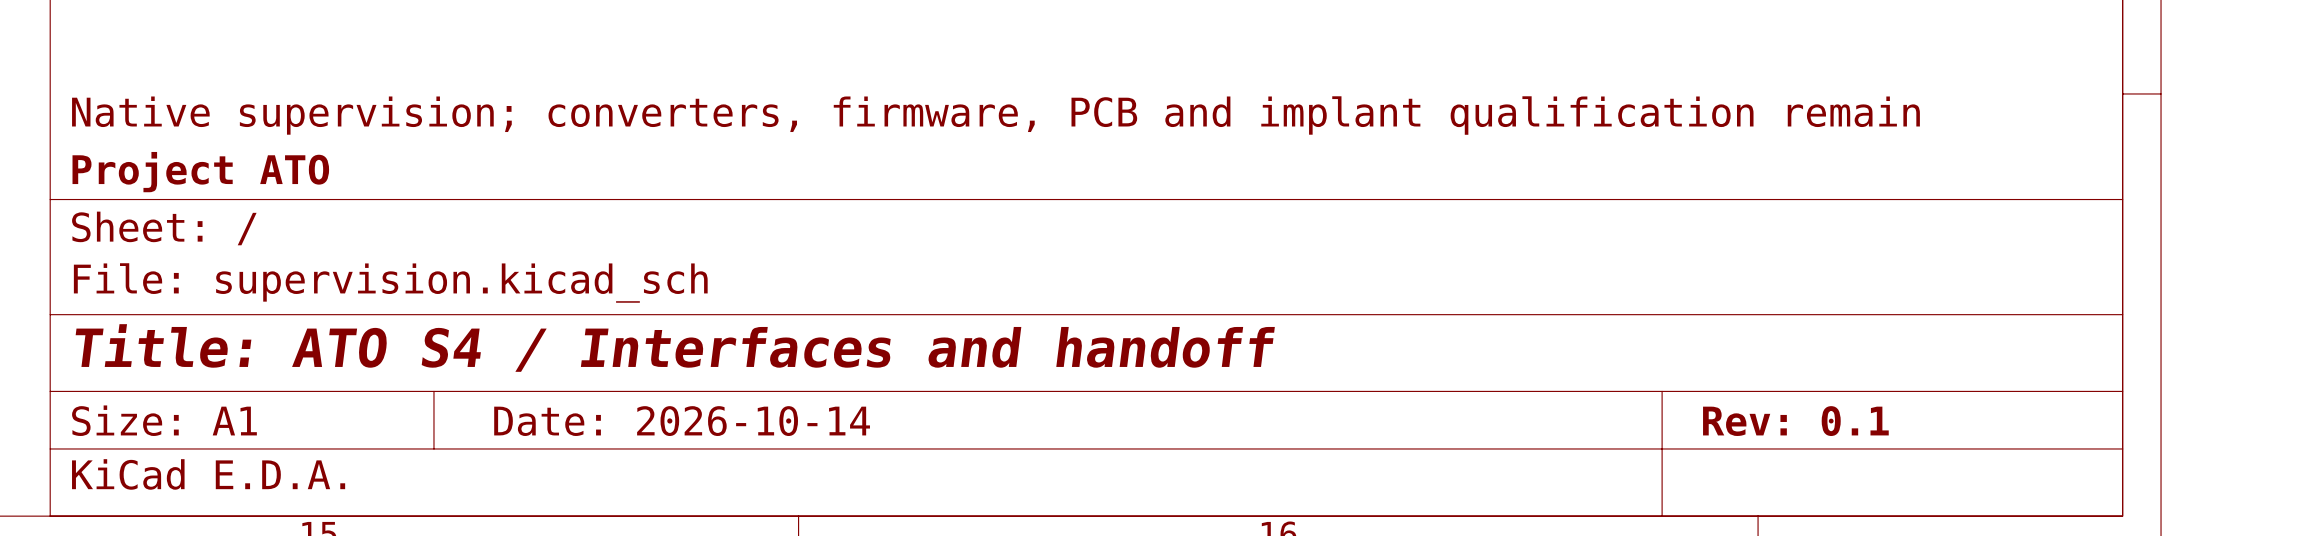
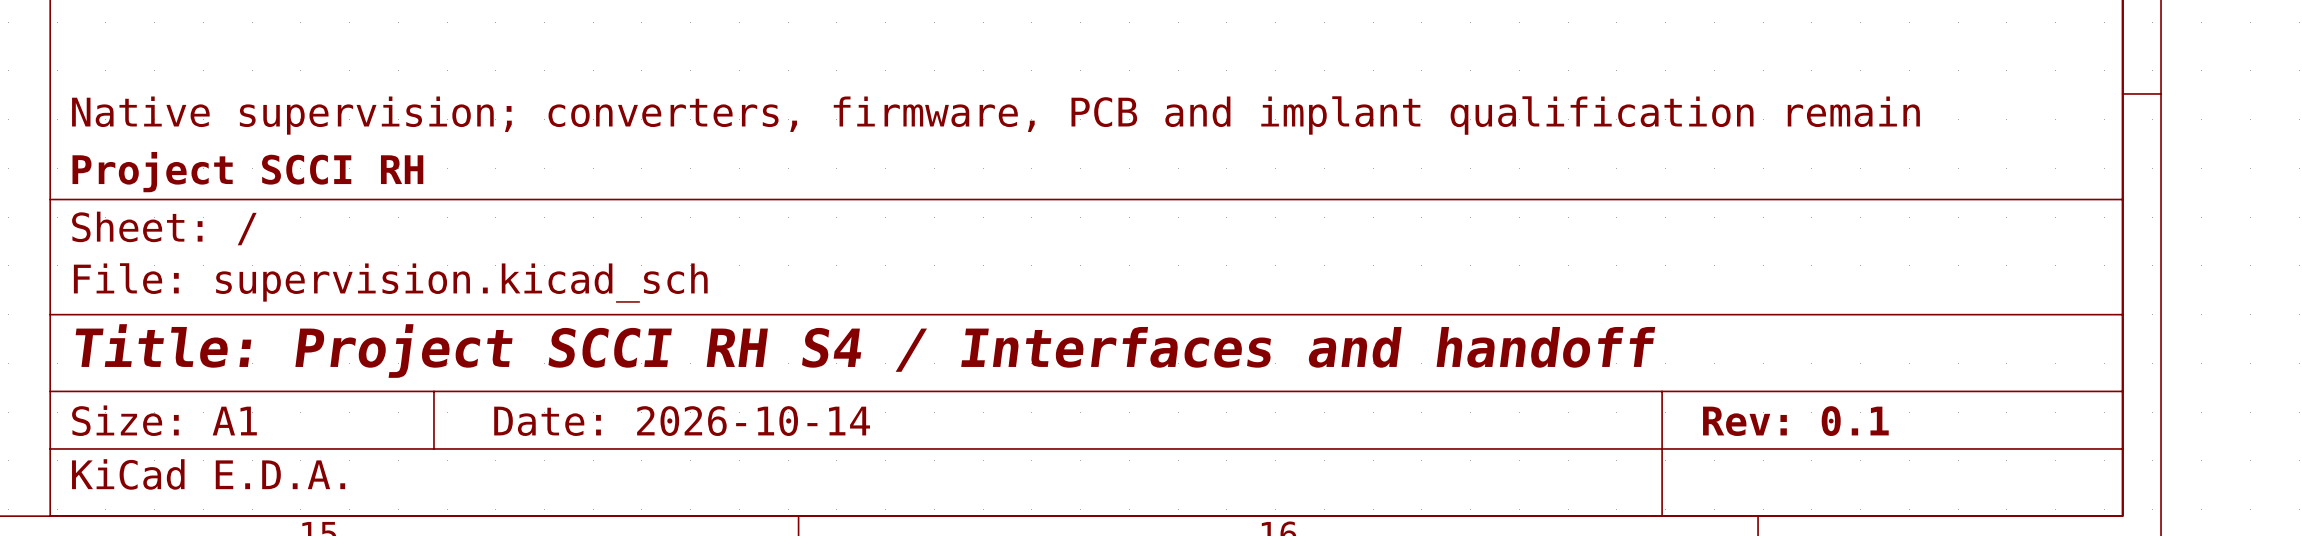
title block: Project ATO (200, 172) -> Project SCCI RH (247, 172)
title block: Title: ATO S4 / Interfaces and handoff (675, 348) -> Title: Project SCCI RH S4 / Interfaces and handoff (865, 351)

